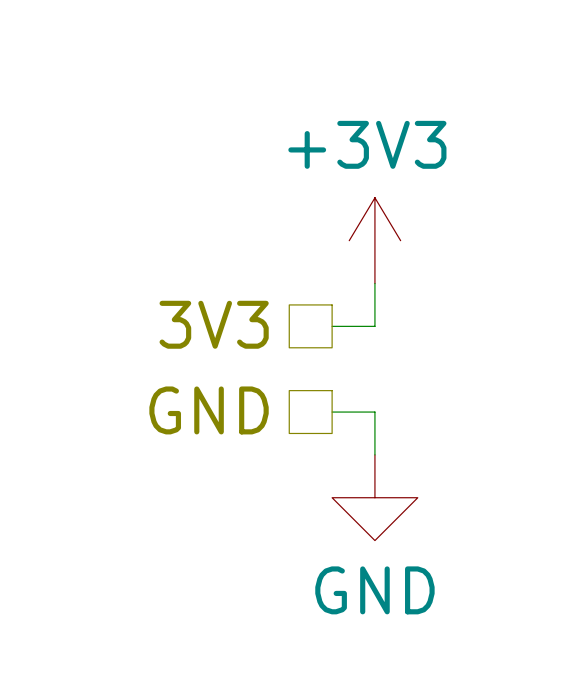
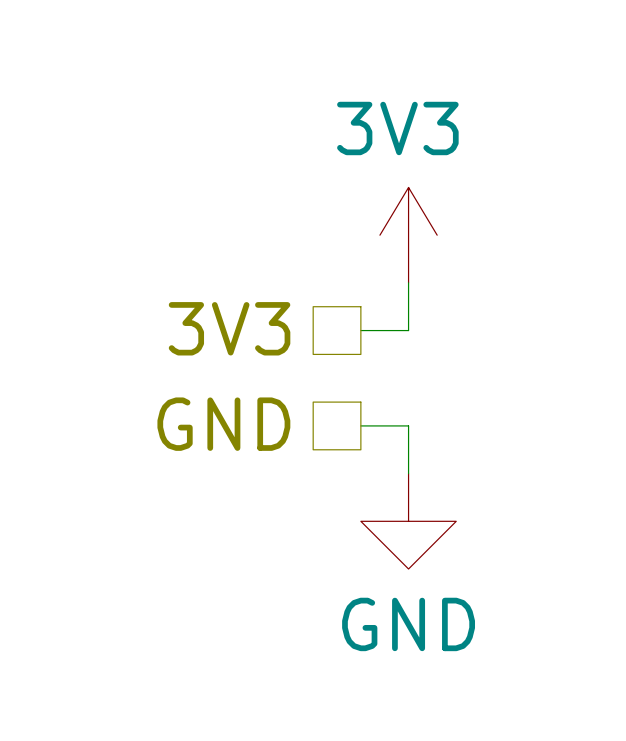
power symbol: +3V3 (374, 240) -> 3V3 (408, 235)

